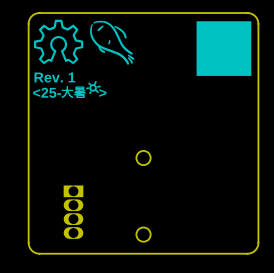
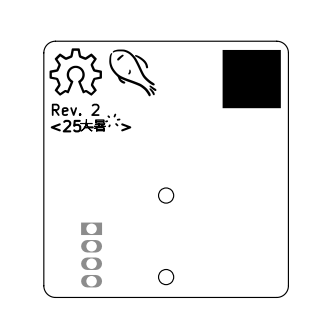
text: Rev. 1 (54, 77) -> Rev. 2 (75, 109)
drawing: [89, 84, 97, 92] -> none
part footprint: [63, 185, 84, 239] -> [81, 222, 103, 288]

